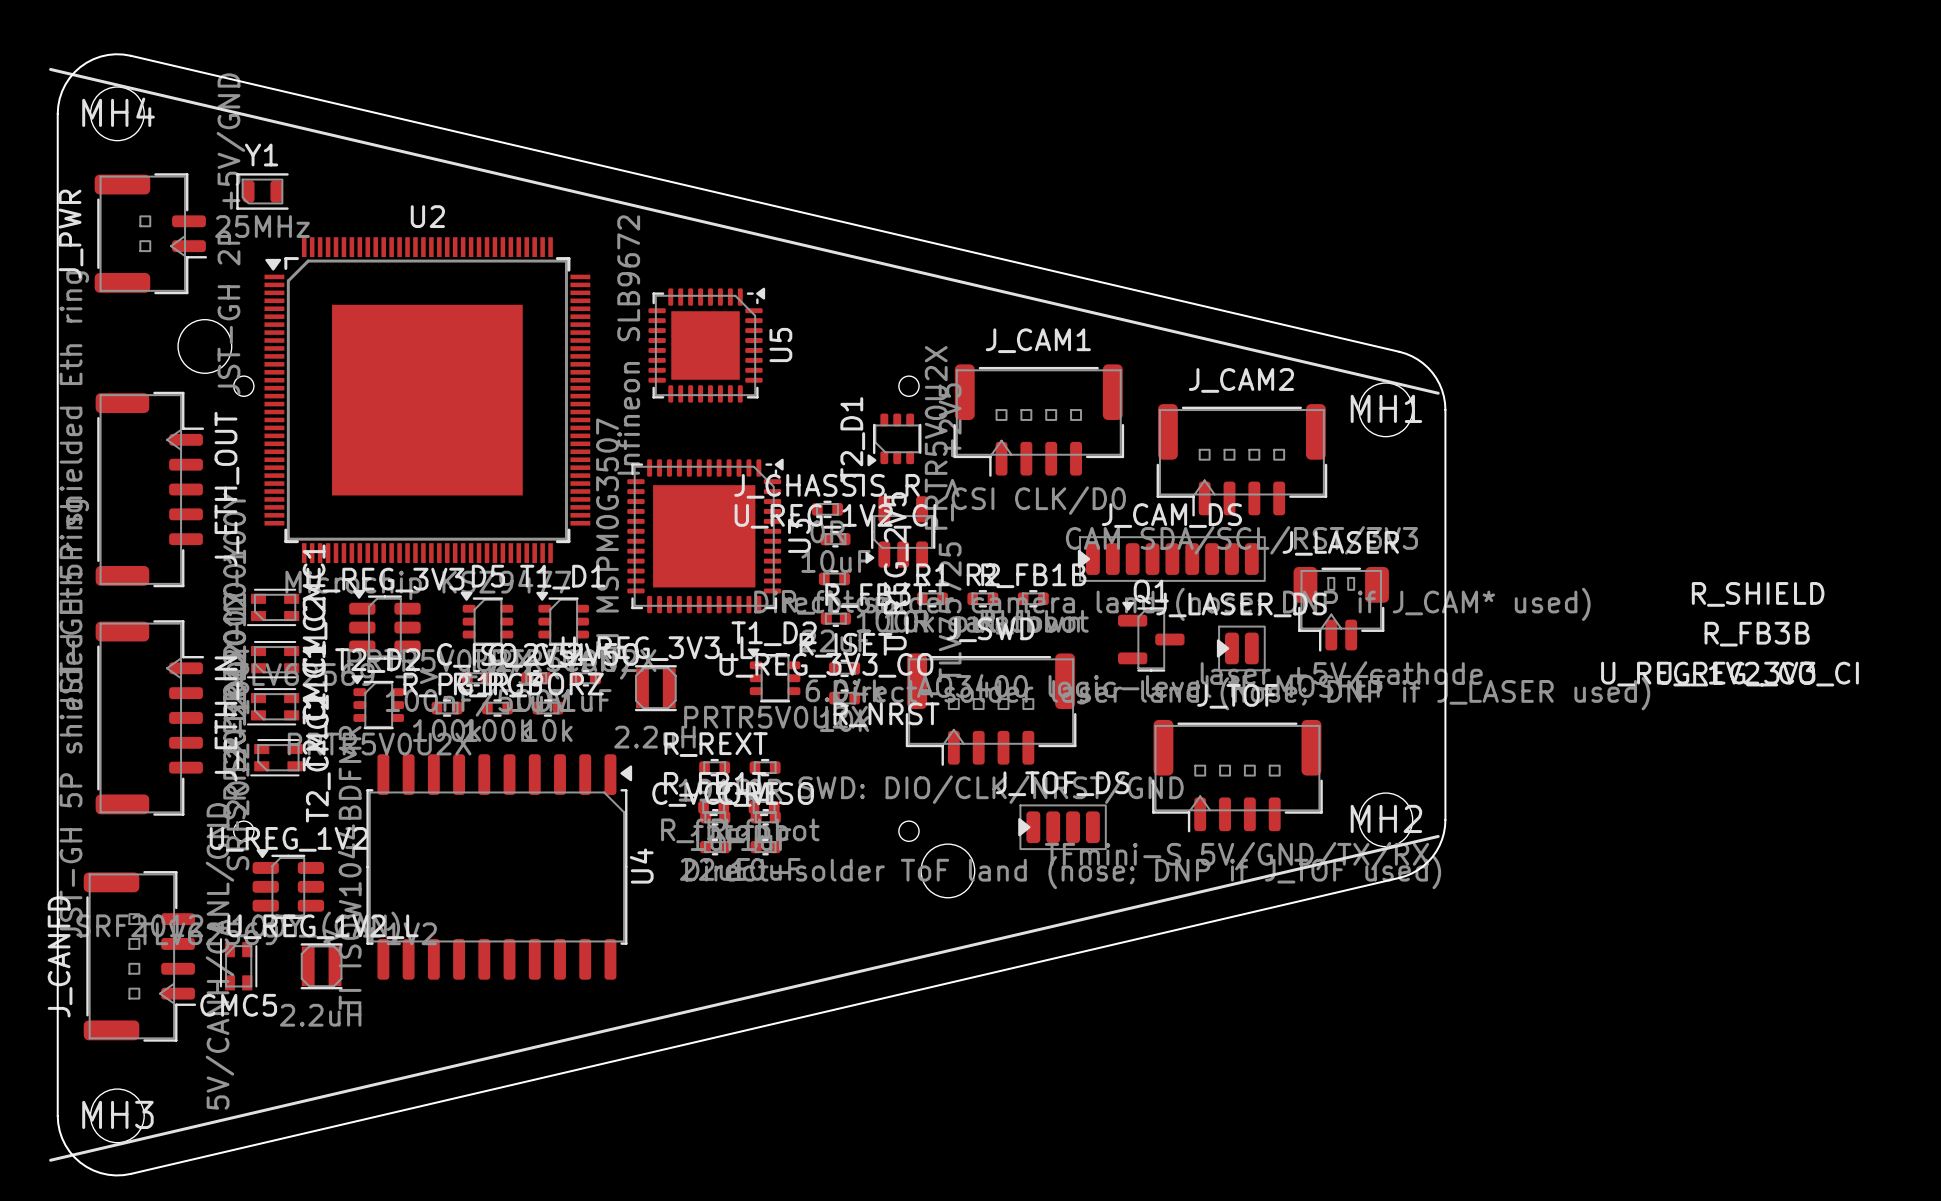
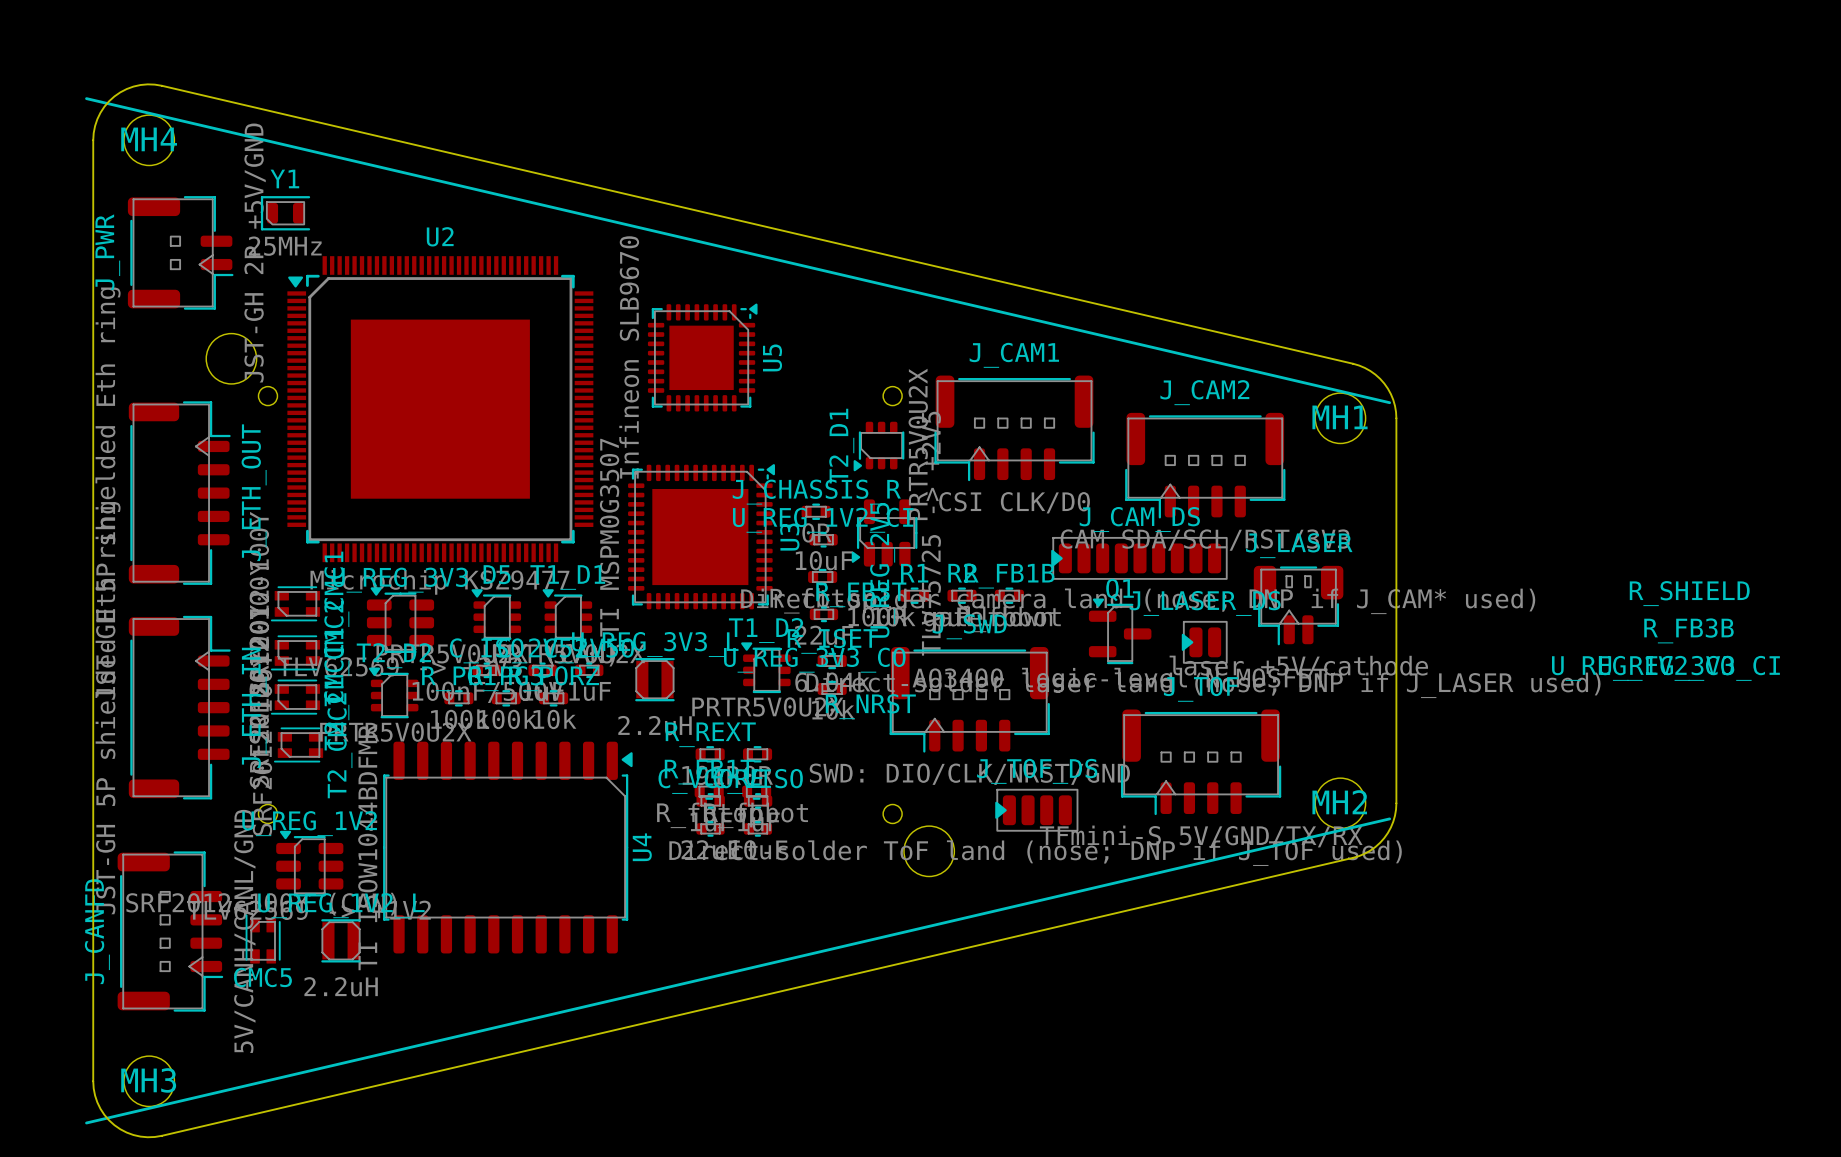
U5 value: Infineon SLB9672 (628, 345) -> Infineon SLB9670 (629, 357)

